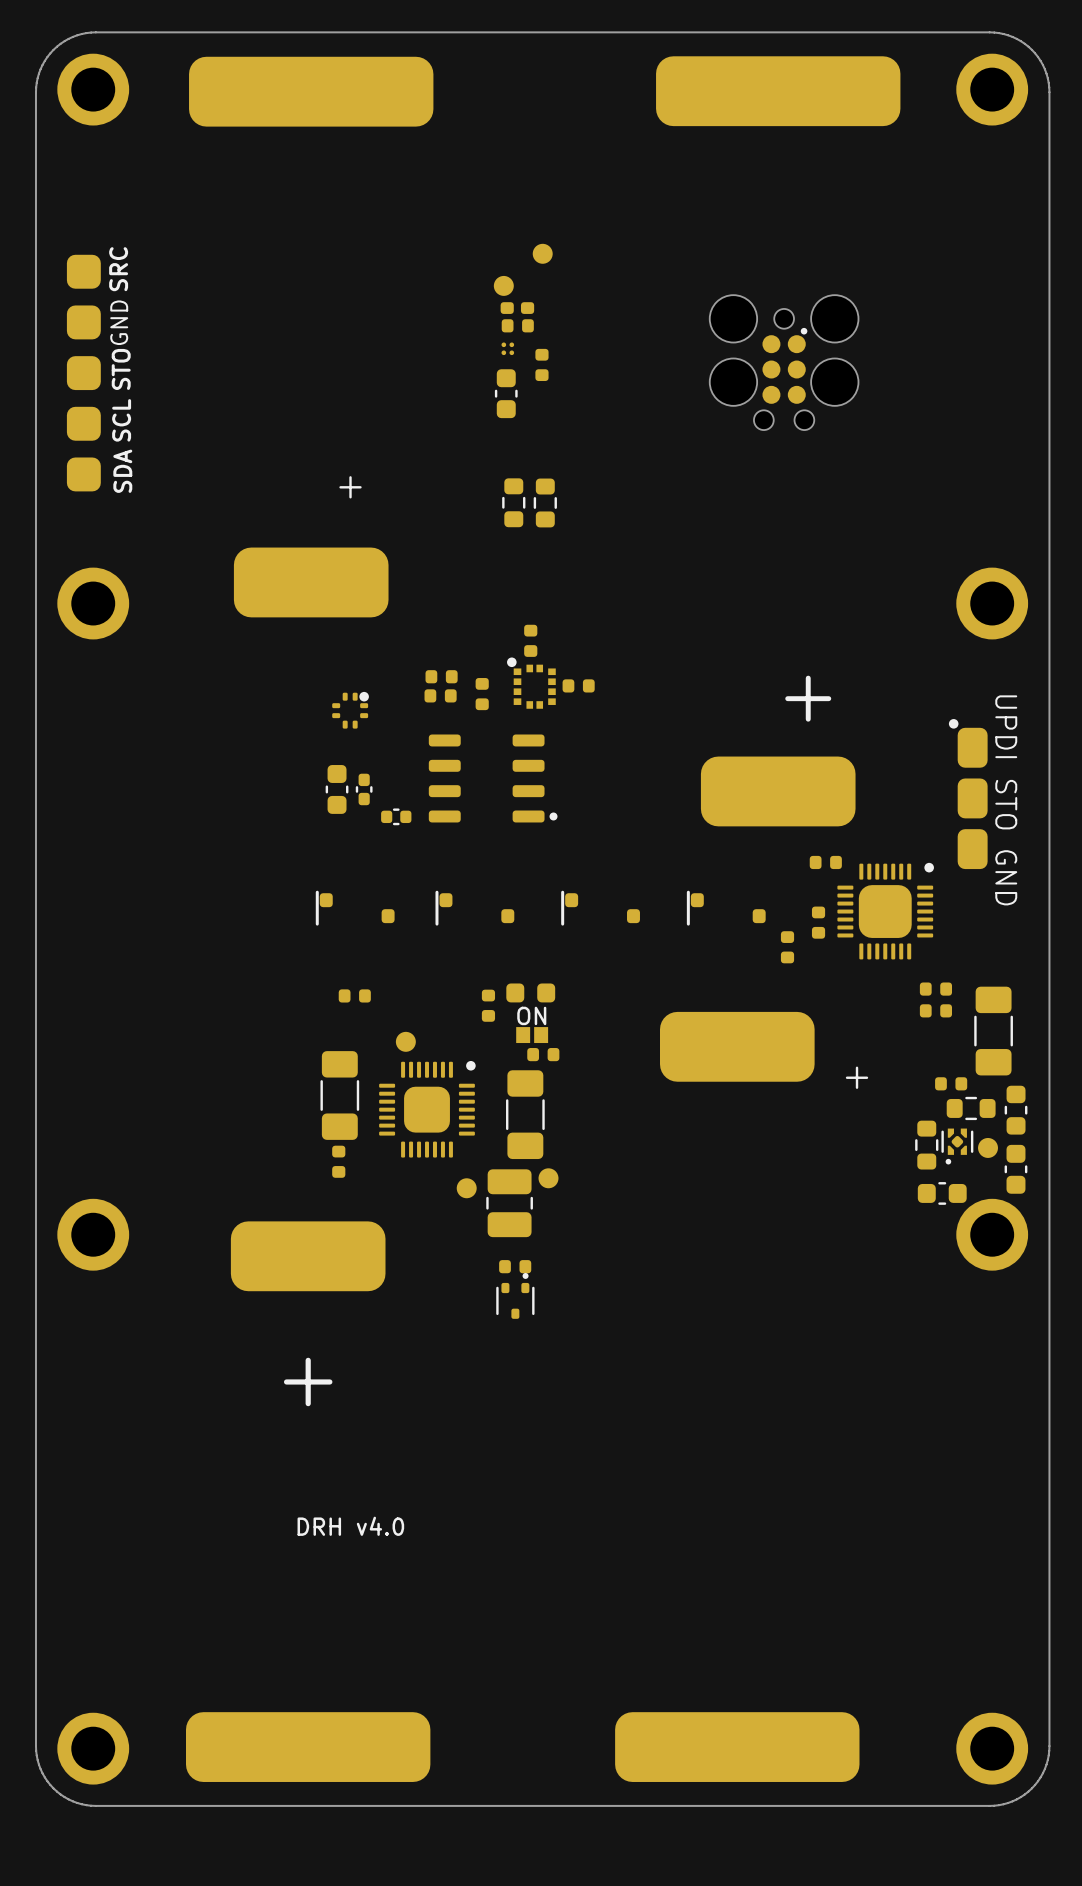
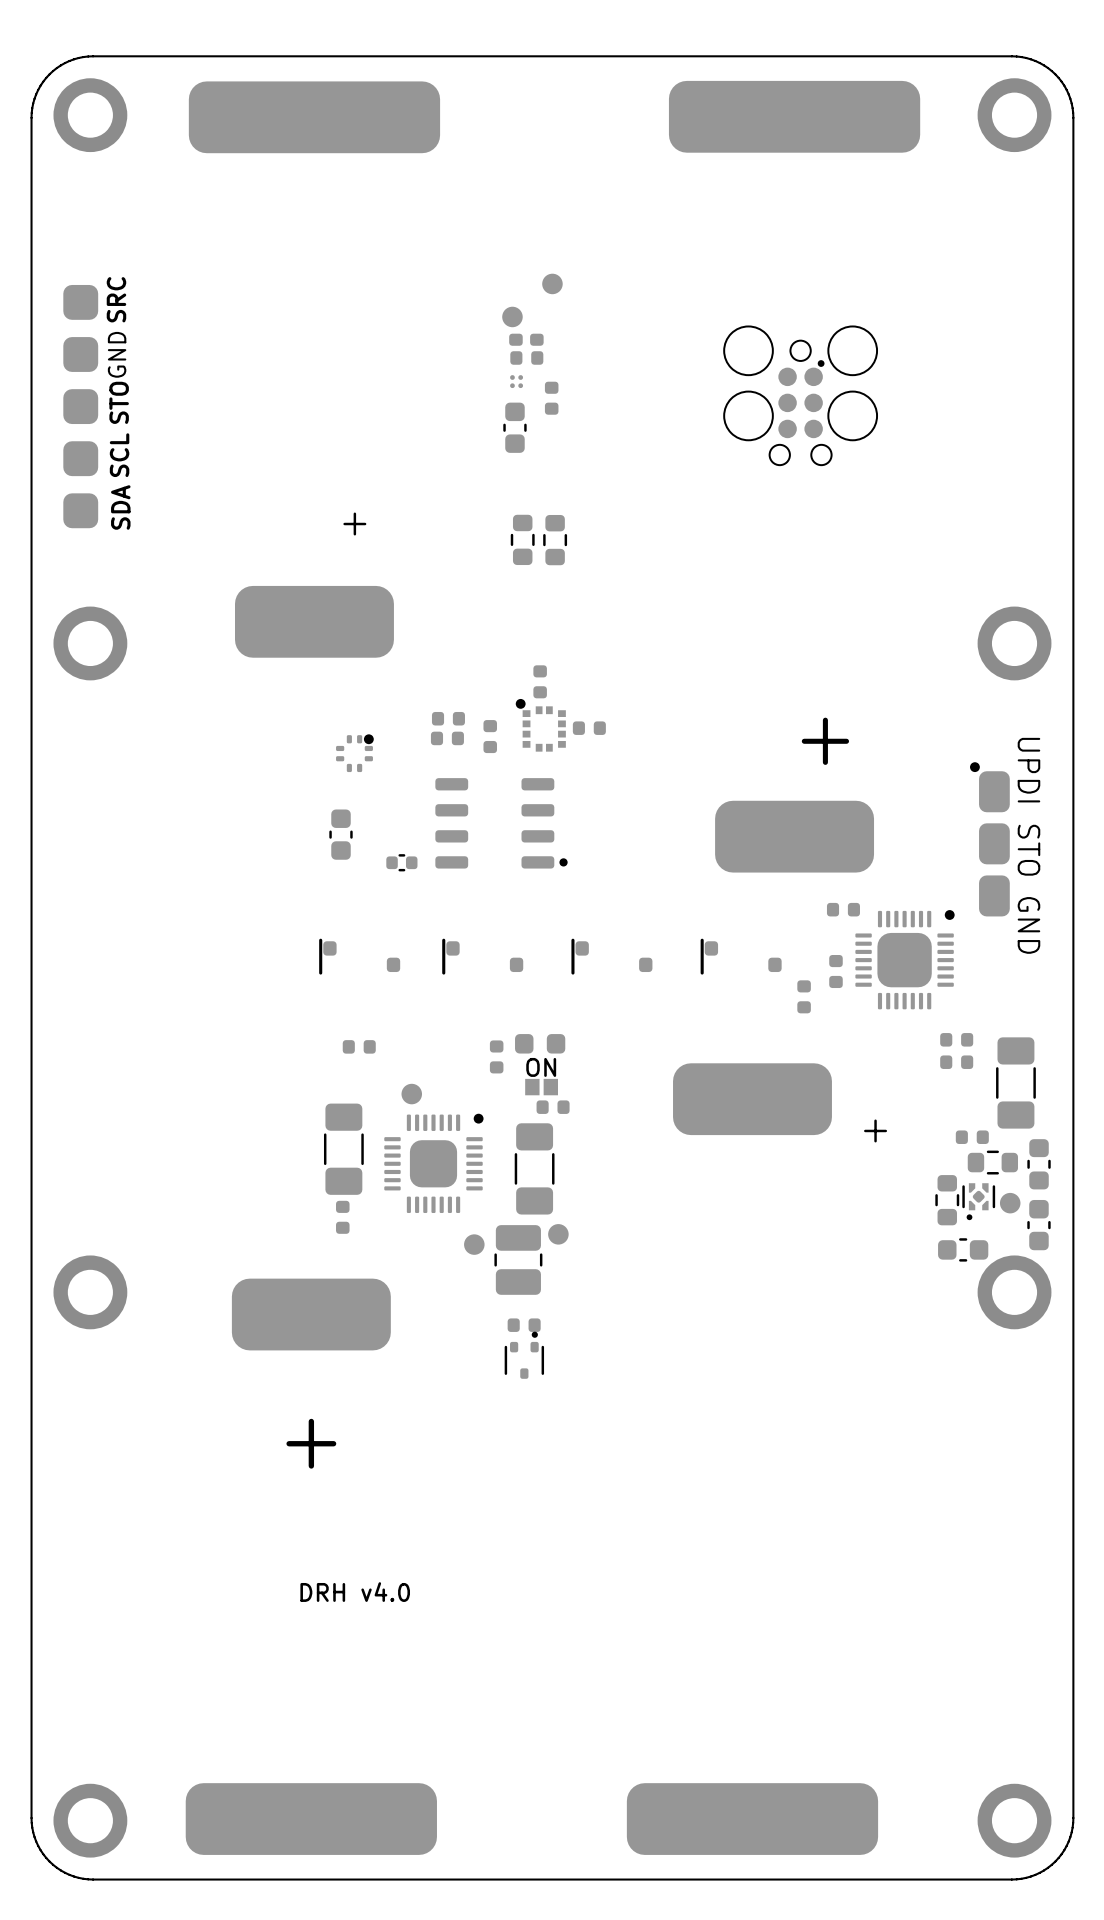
part: (364, 789) -> none

